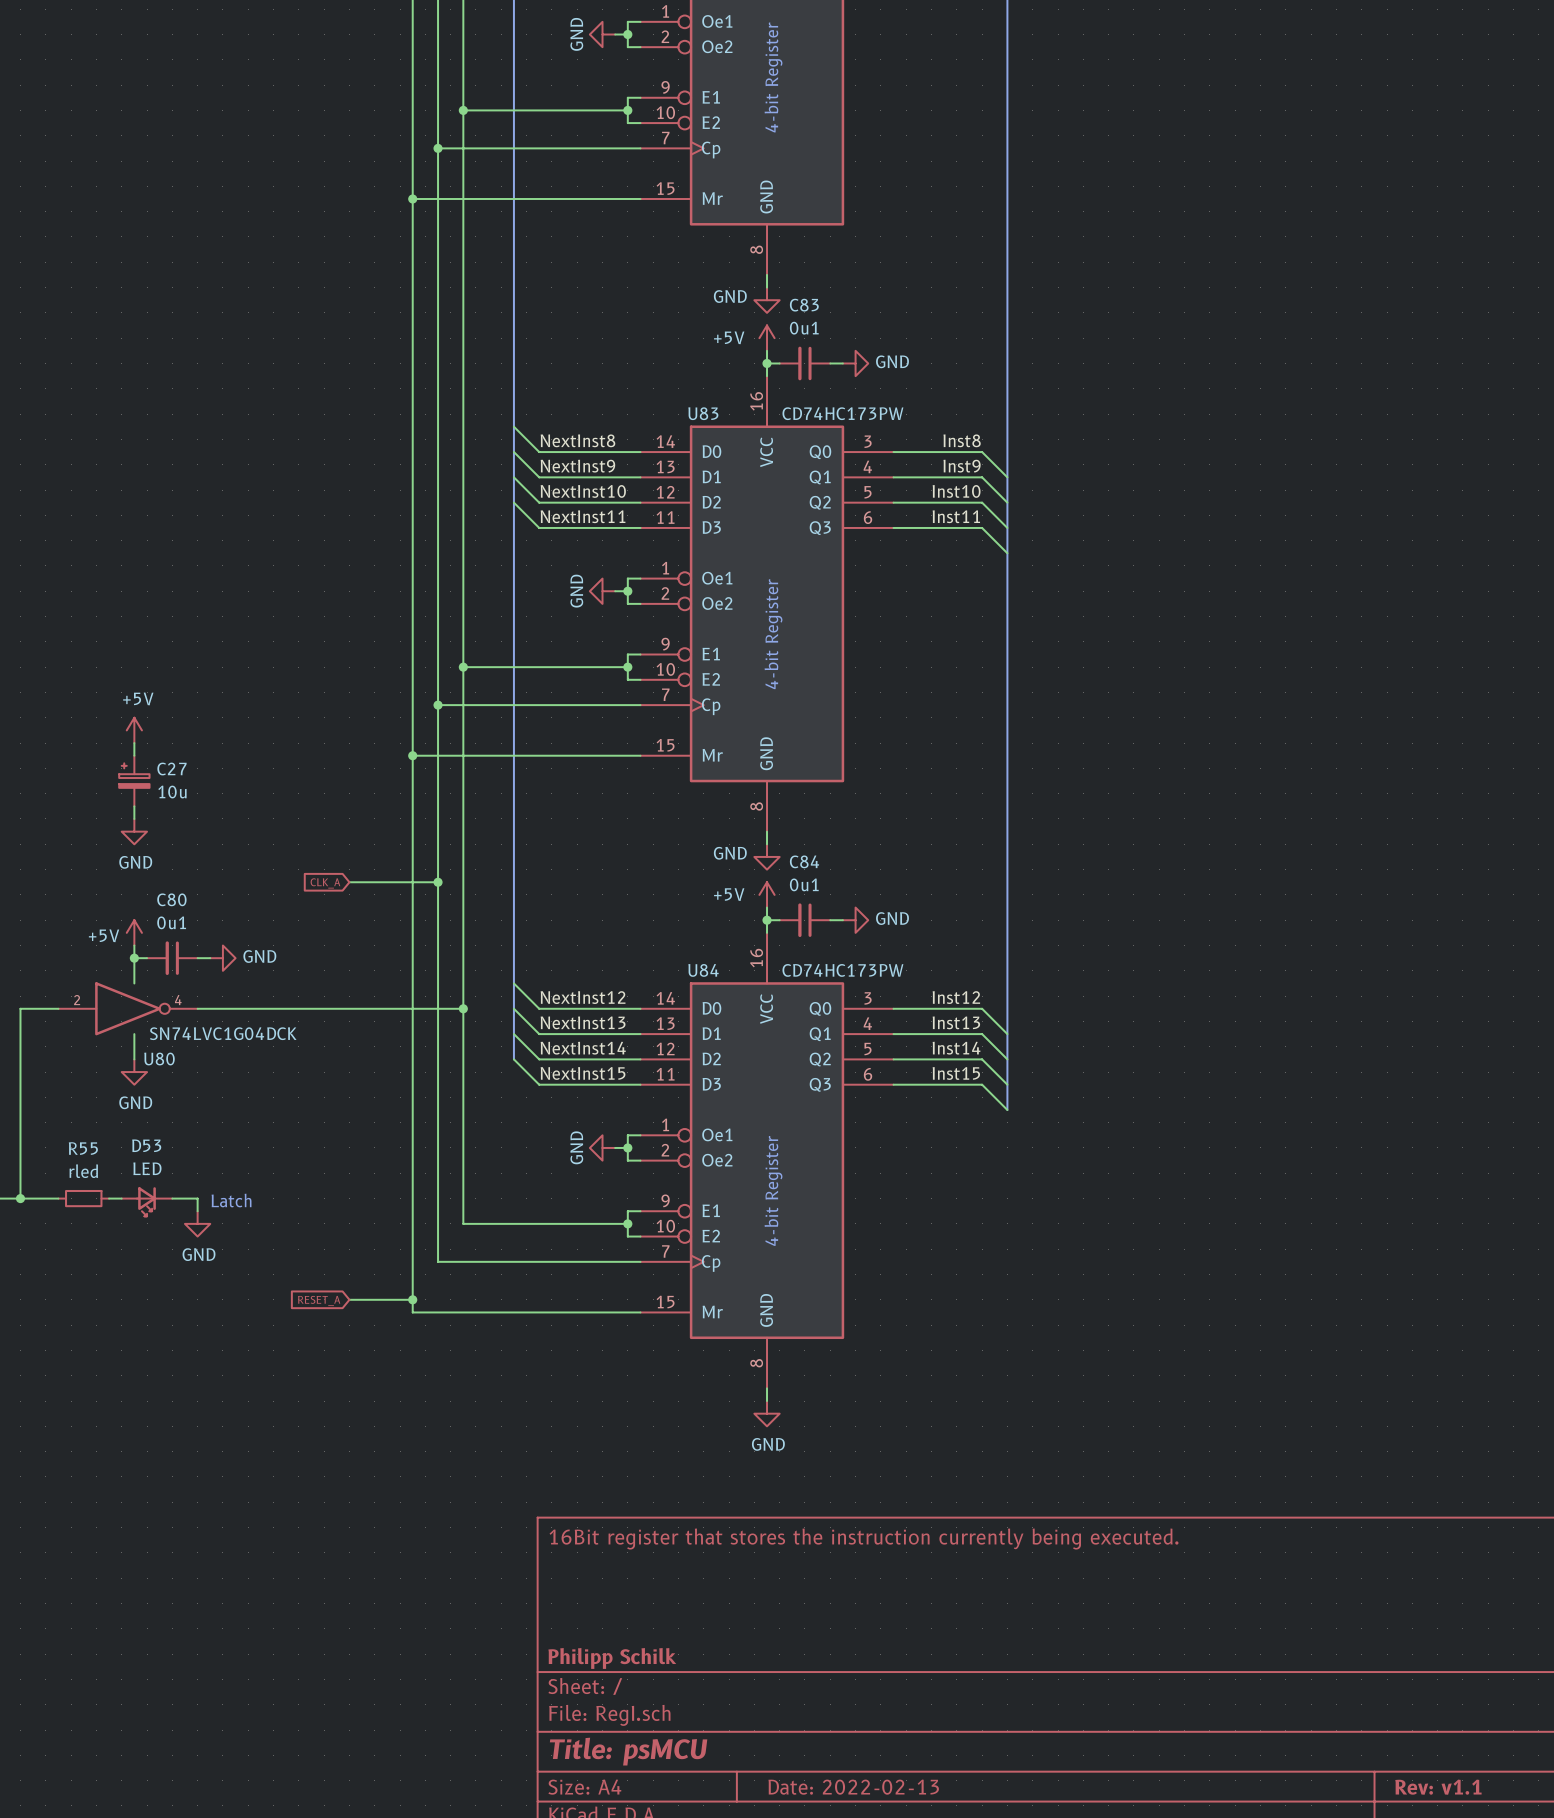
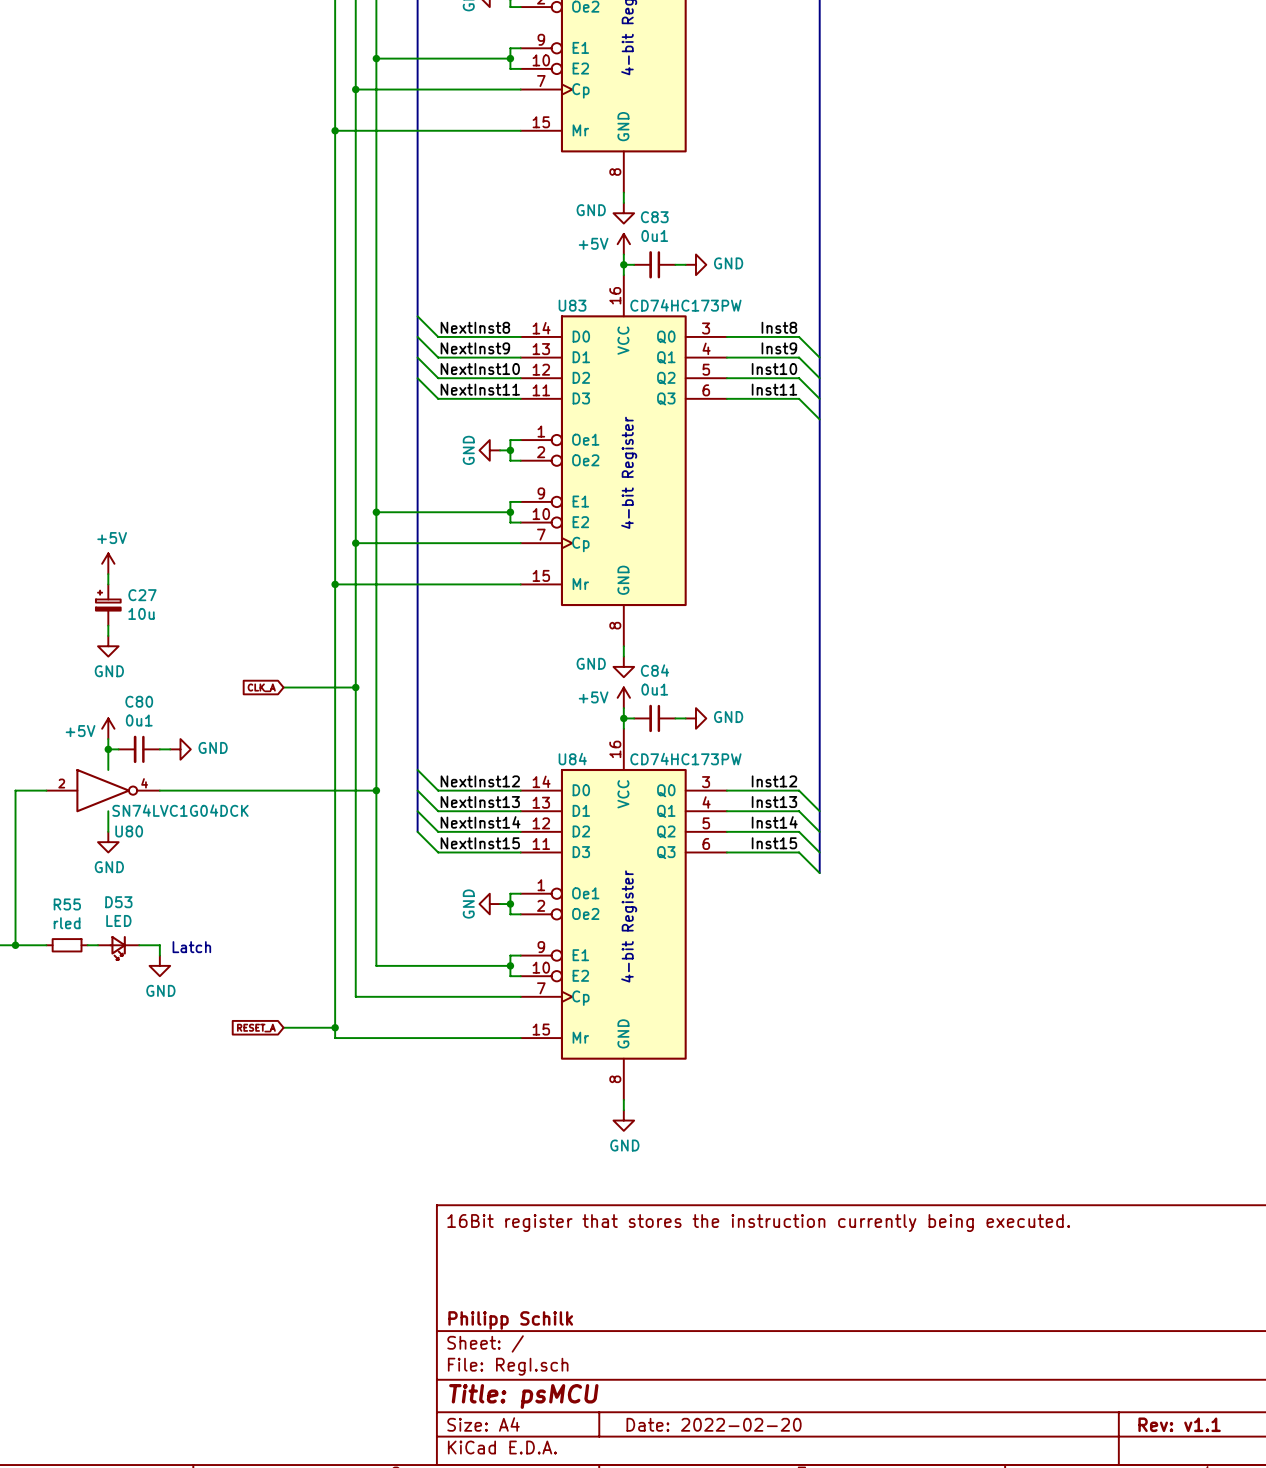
title block: Date: 2022-02-13 (853, 1787) -> Date: 2022-02-20 (714, 1424)

